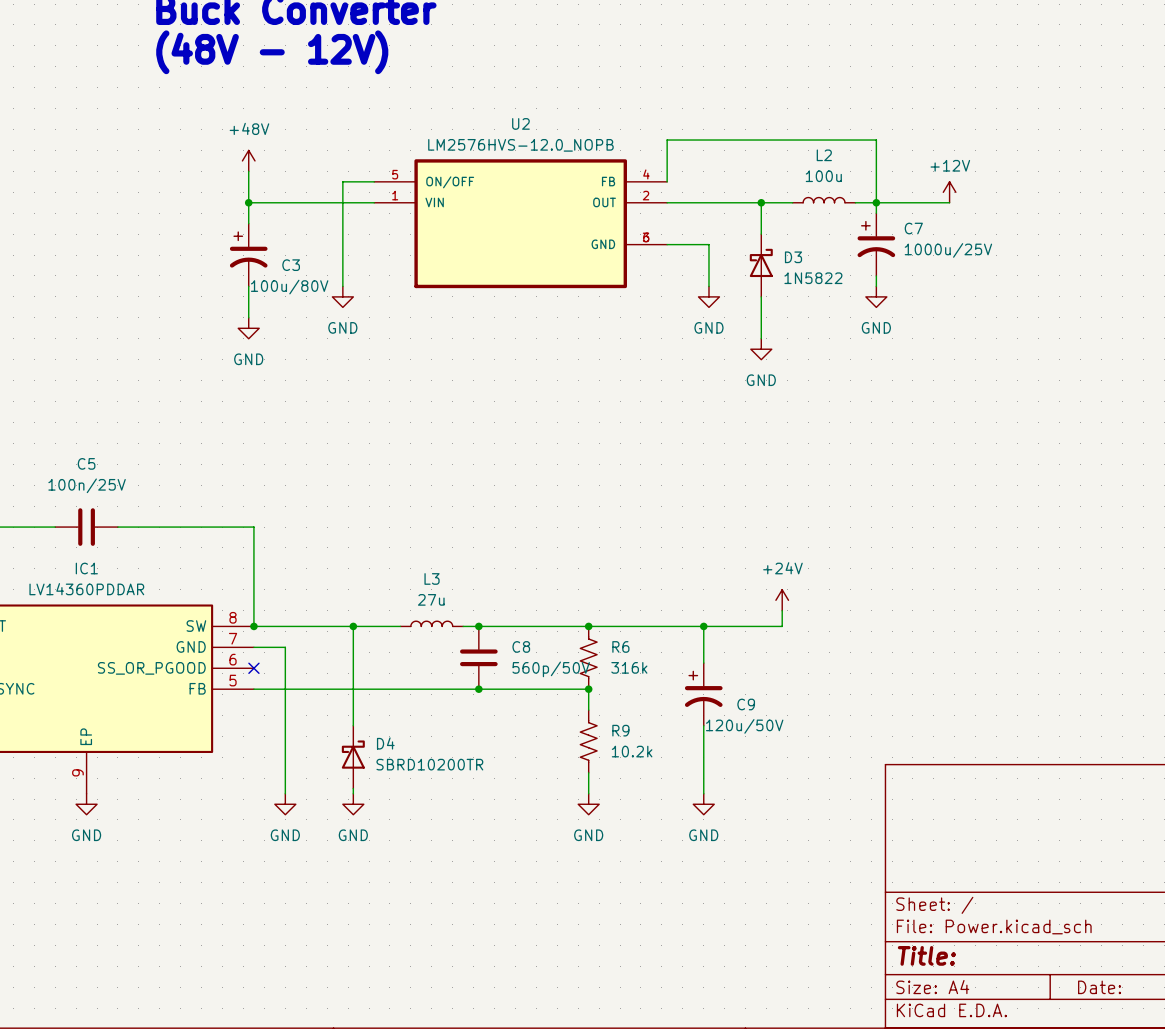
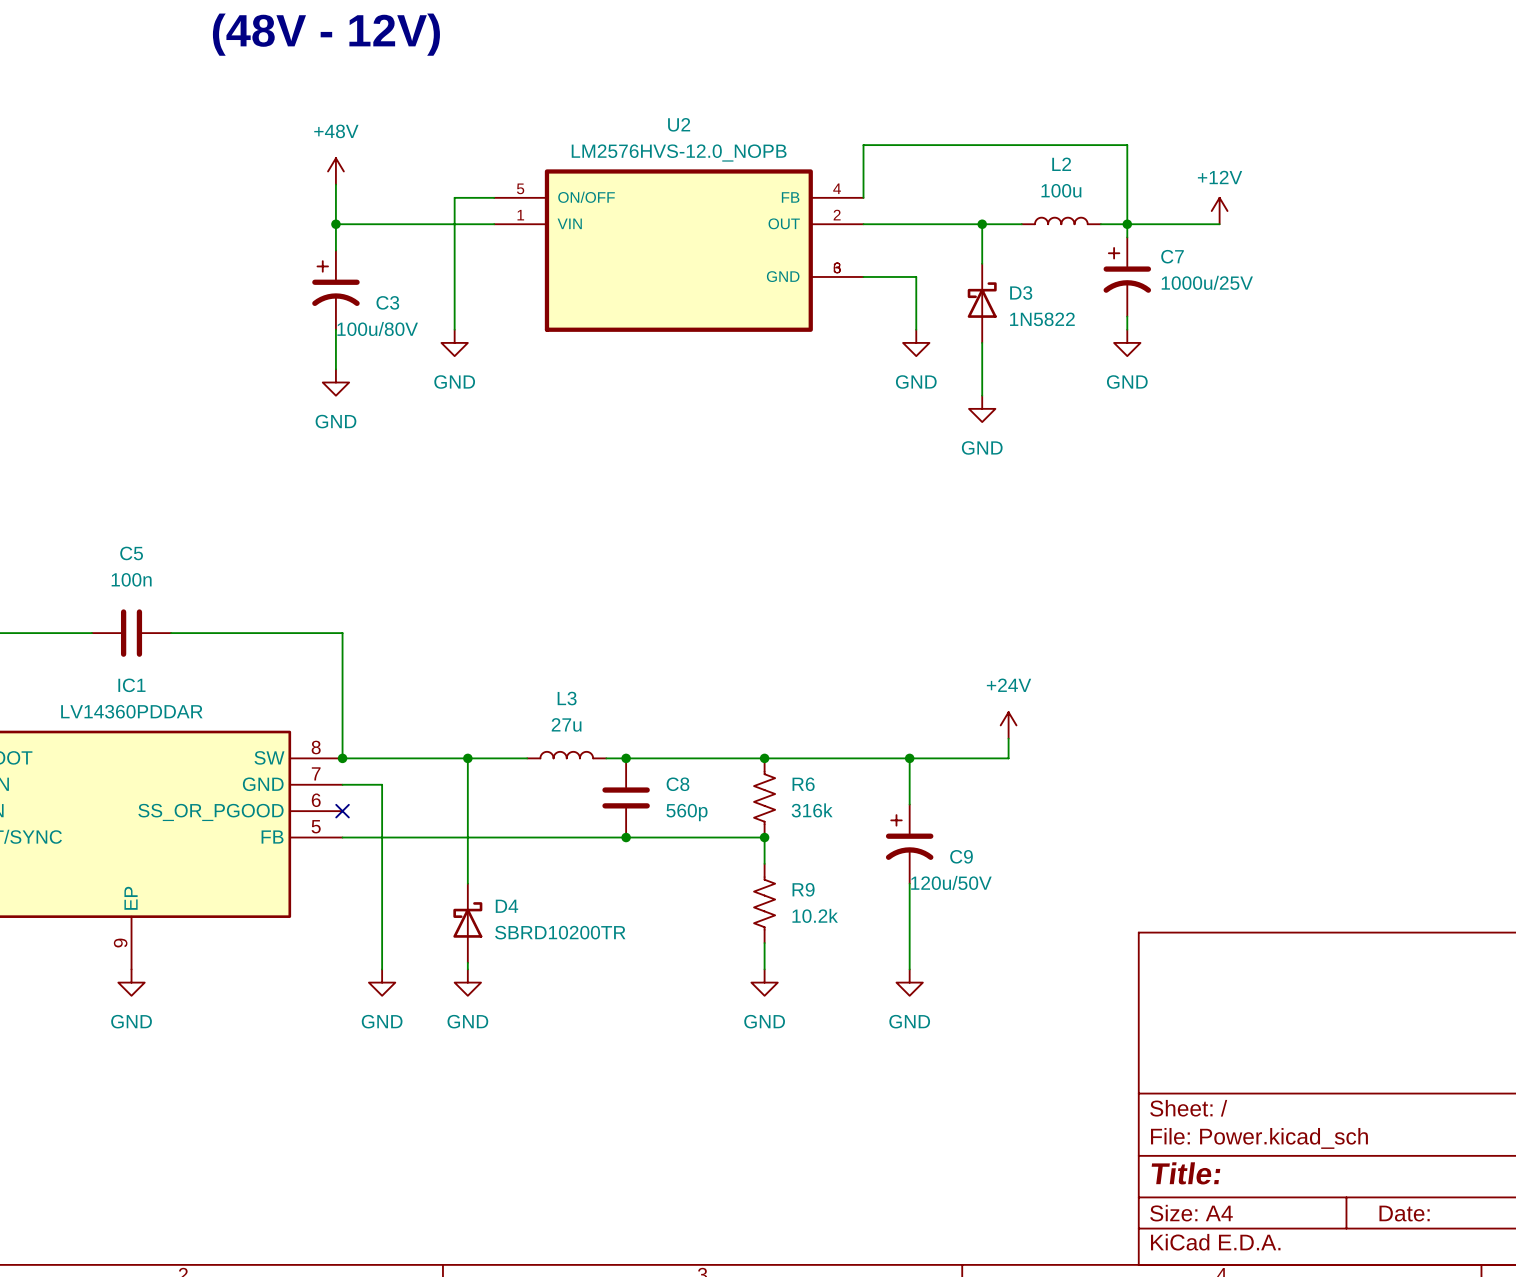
C5 value: 100n/25V (87, 485) -> 100n (131, 579)
C8 value: 560p/50V (551, 669) -> 560p (686, 812)

